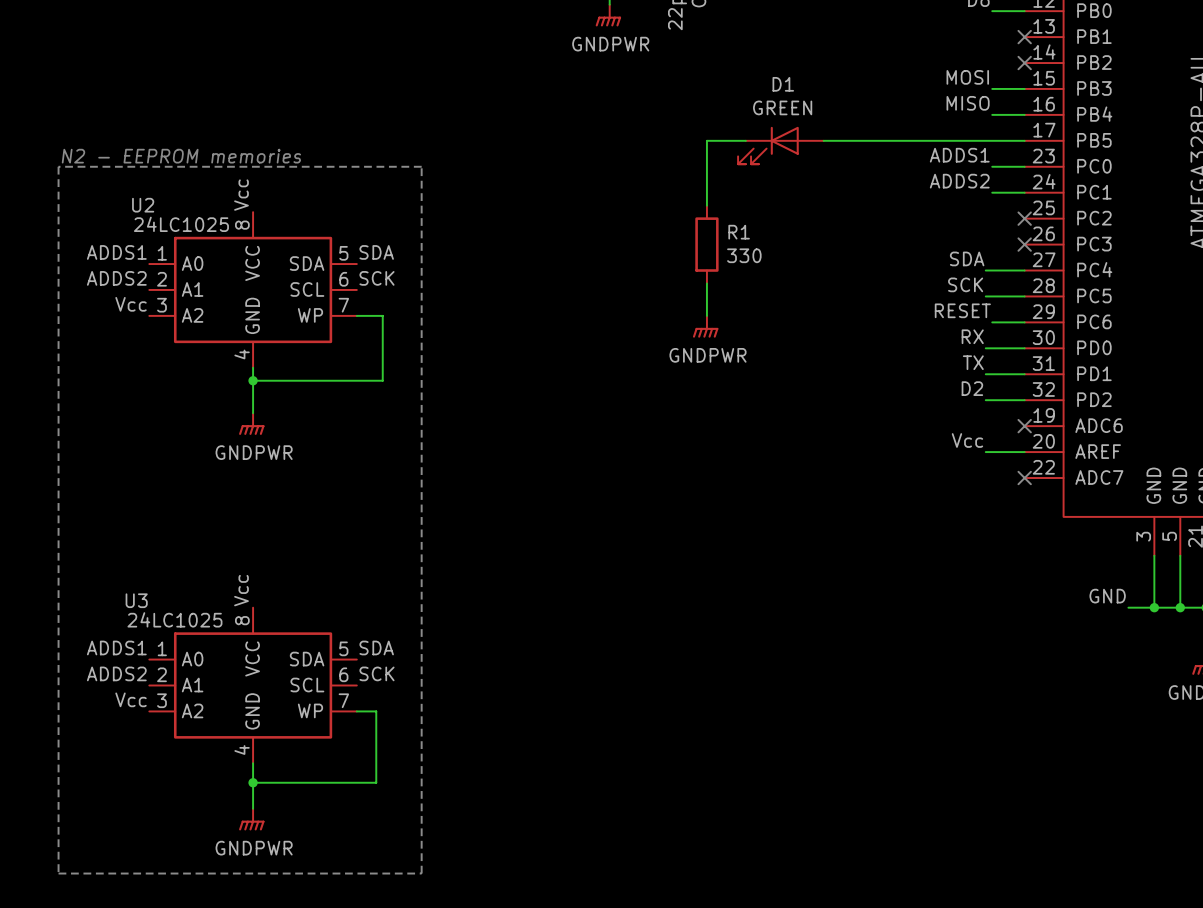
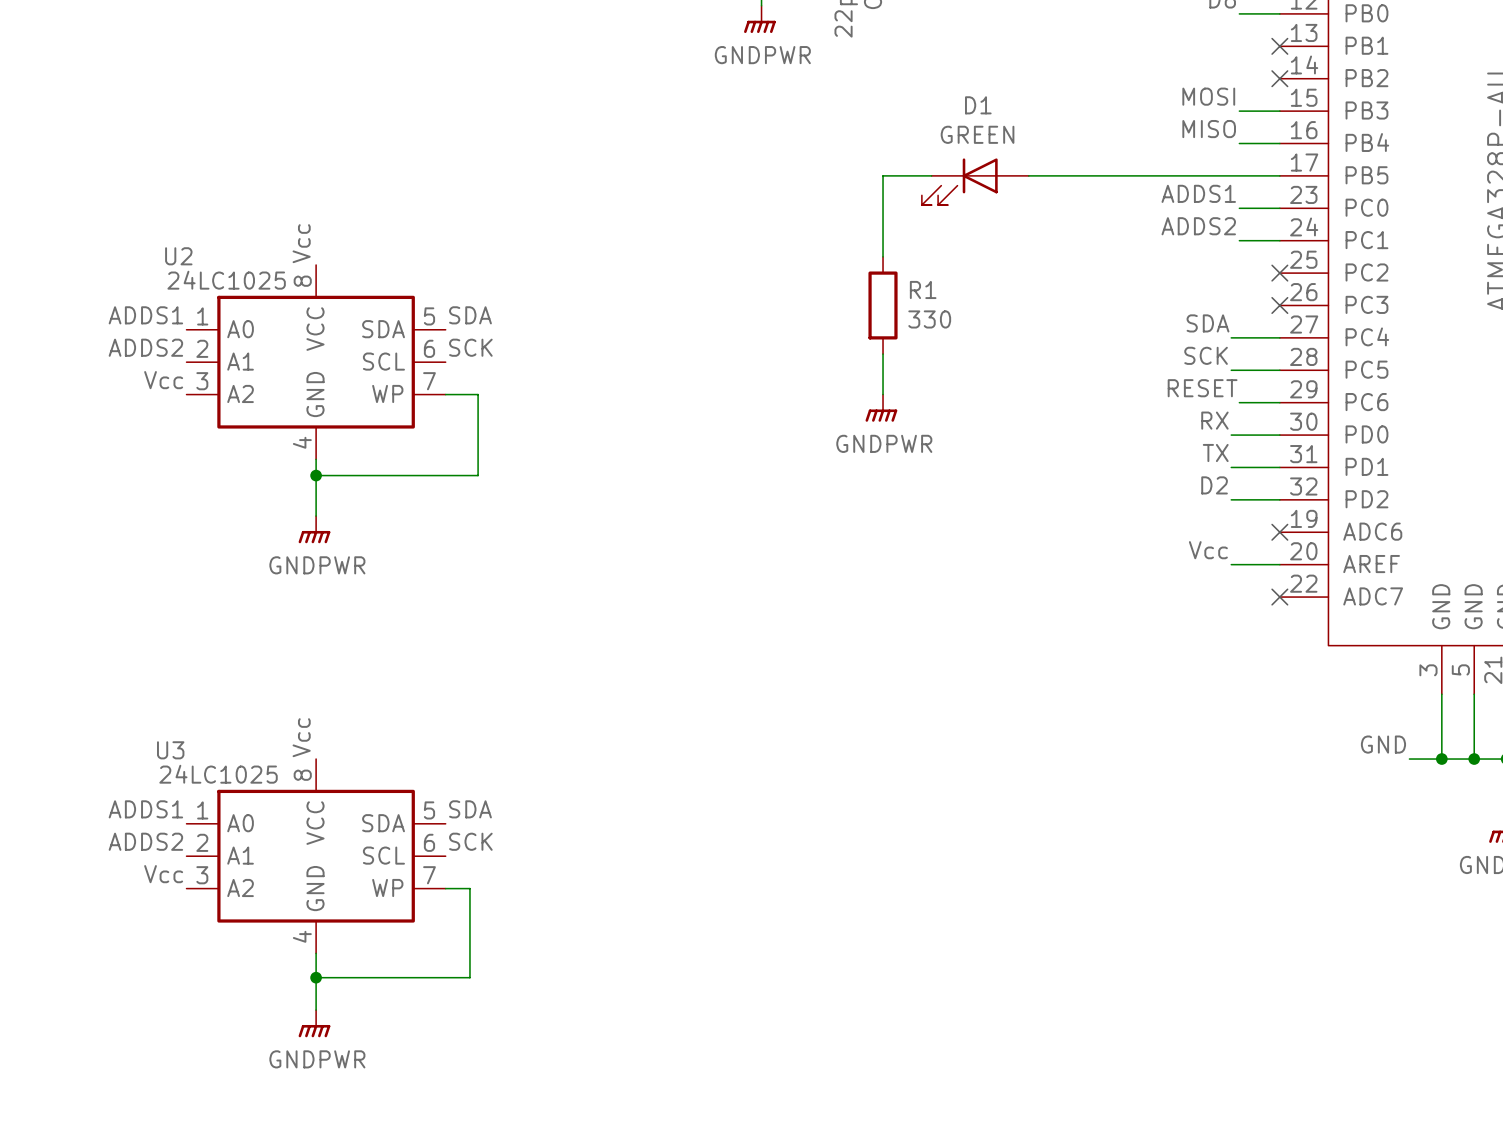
text: N2 - EEPROM memories (181, 156) -> none
line: (58, 166) (58, 873) (421, 873) (421, 166) (58, 166) -> none

